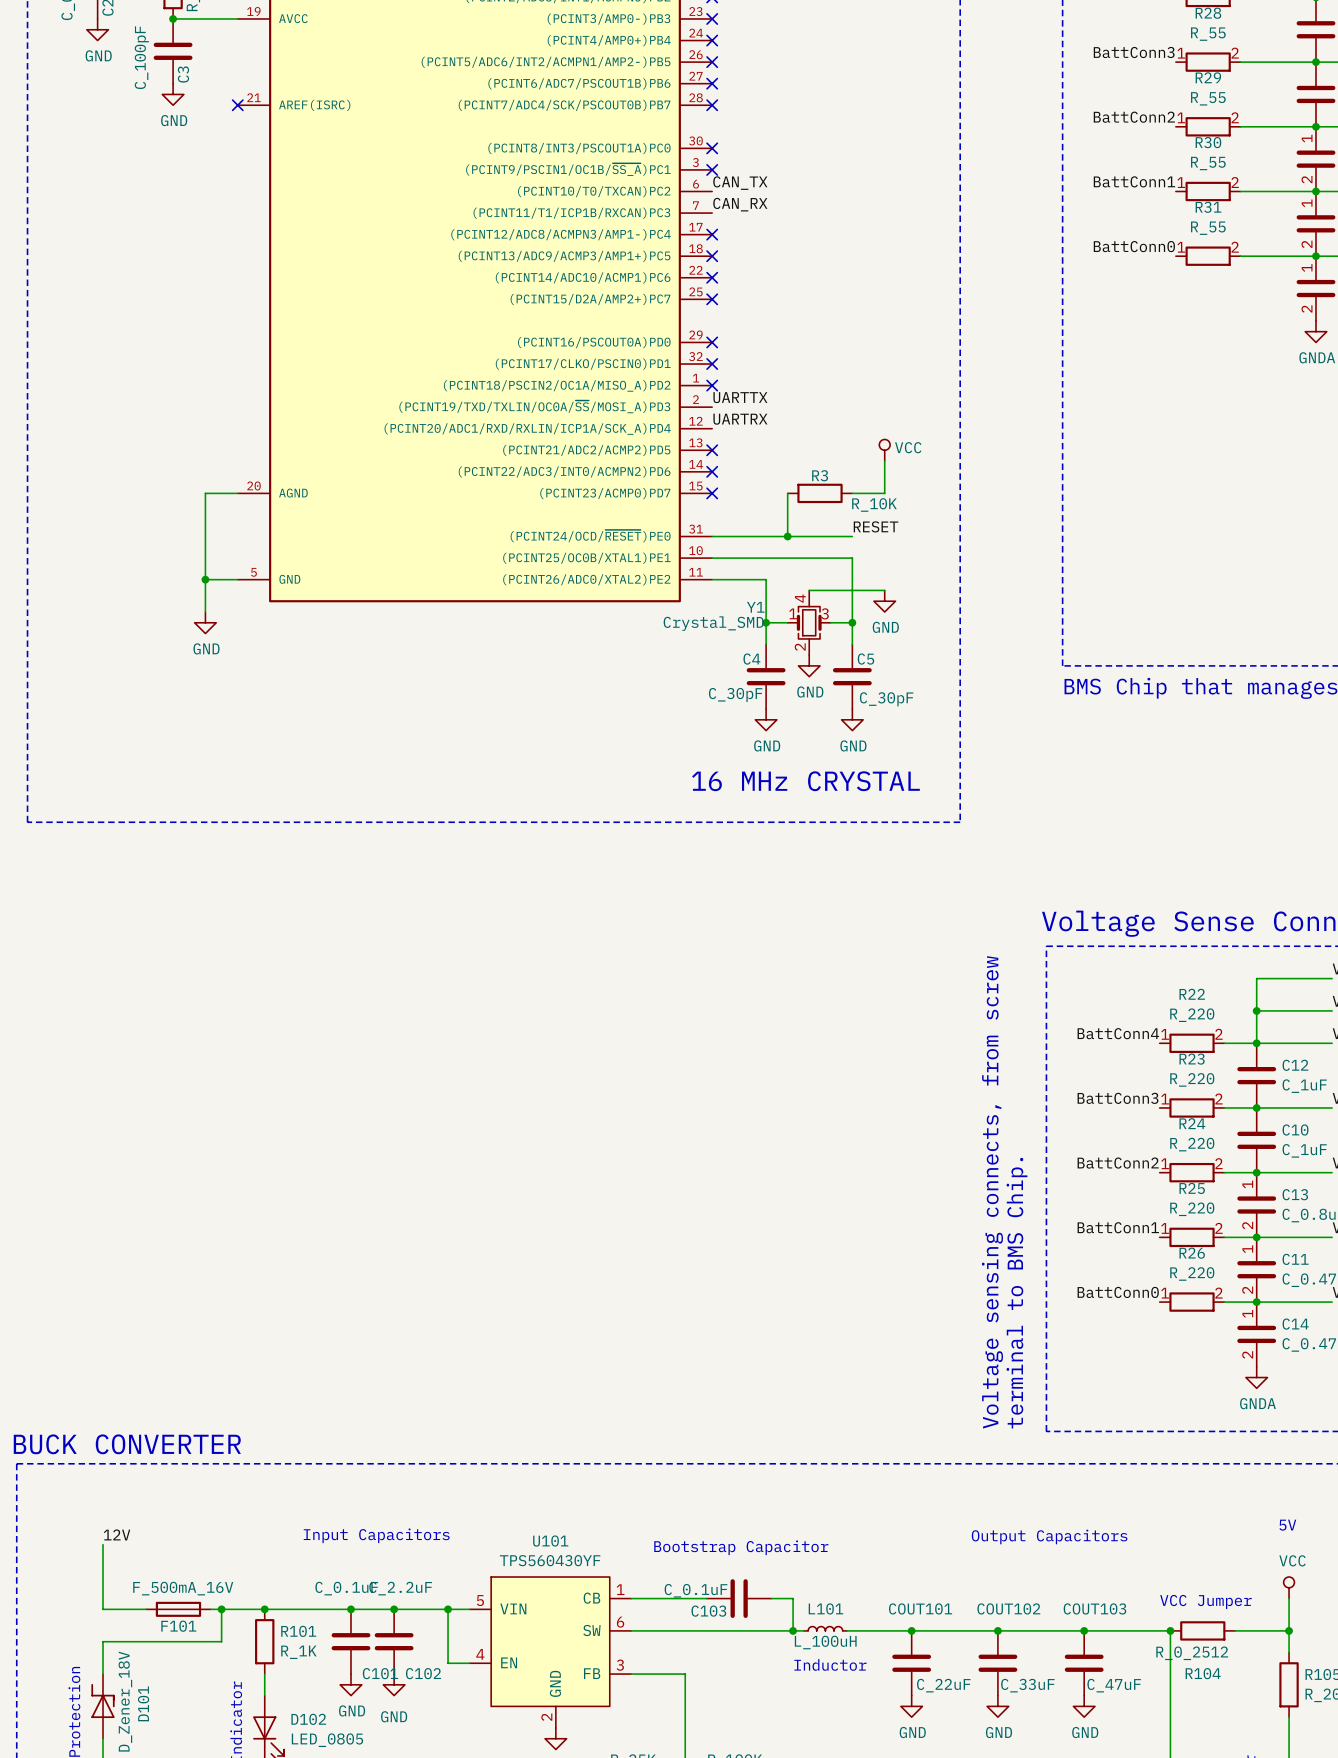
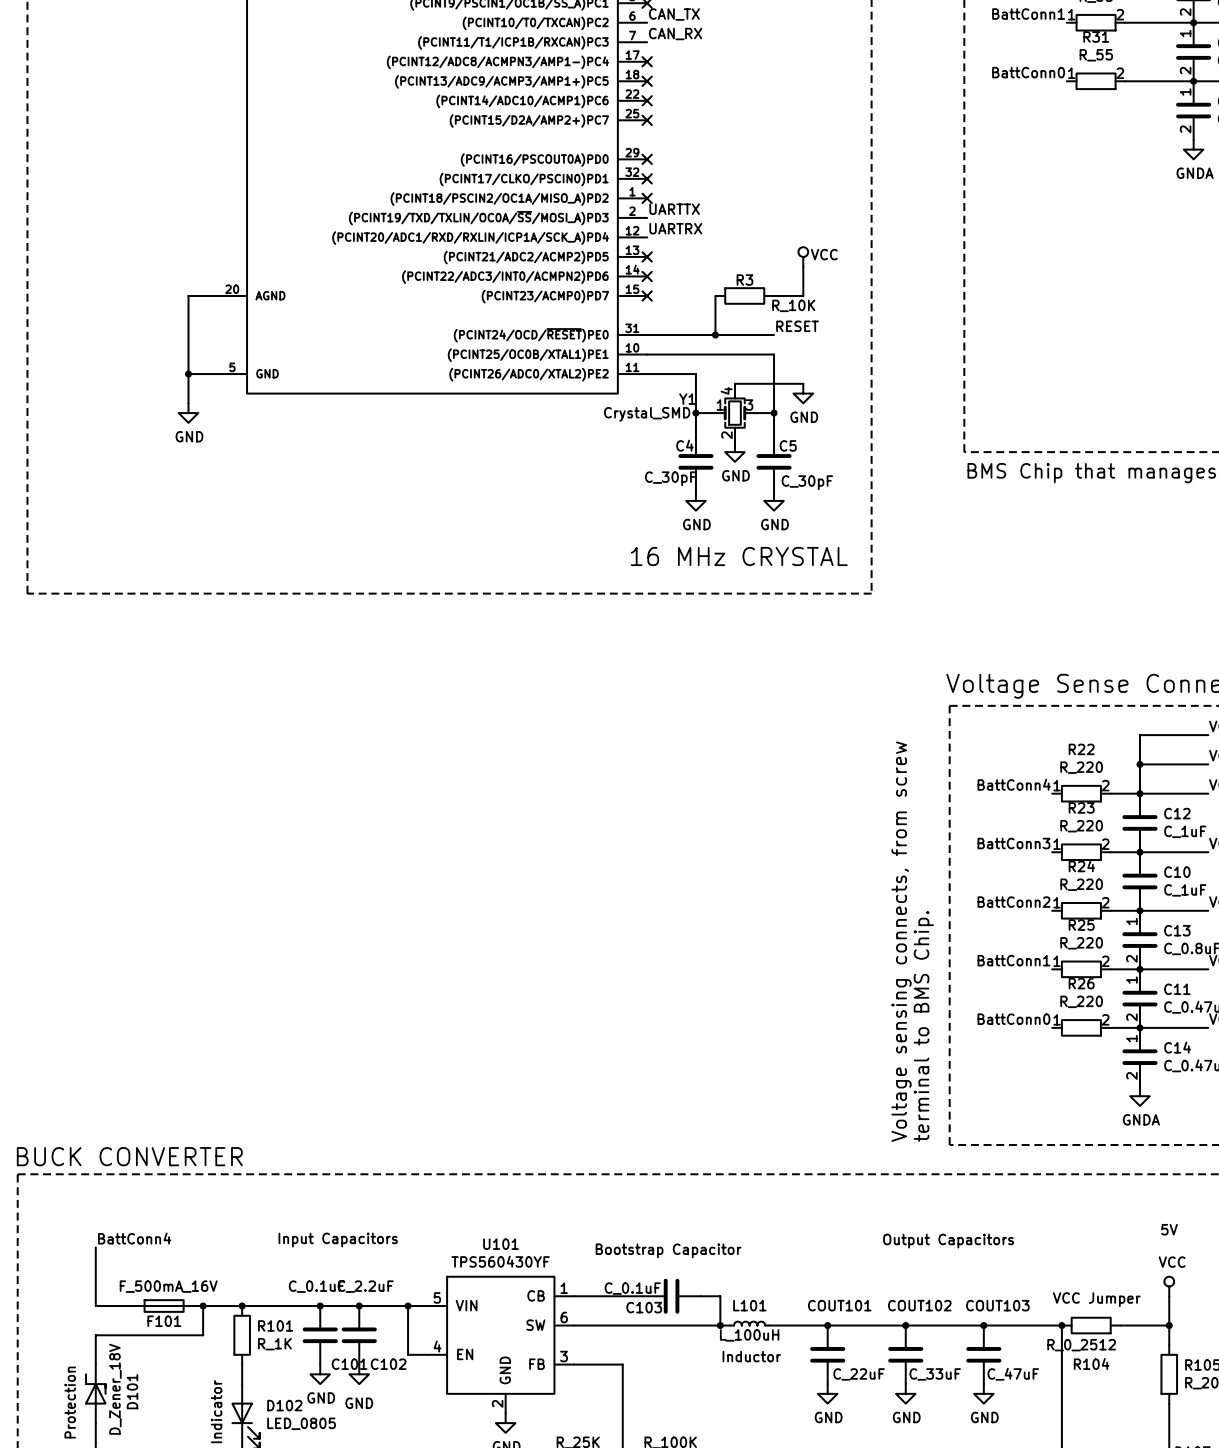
label: 12V (117, 1534) -> BattConn4 (134, 1238)

